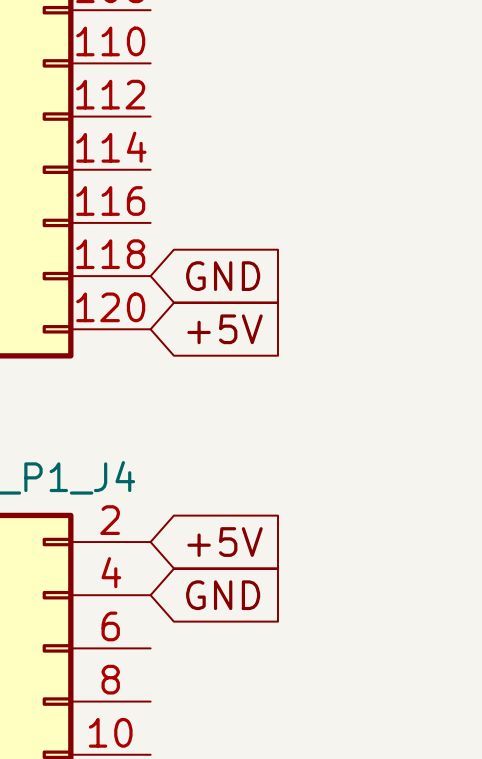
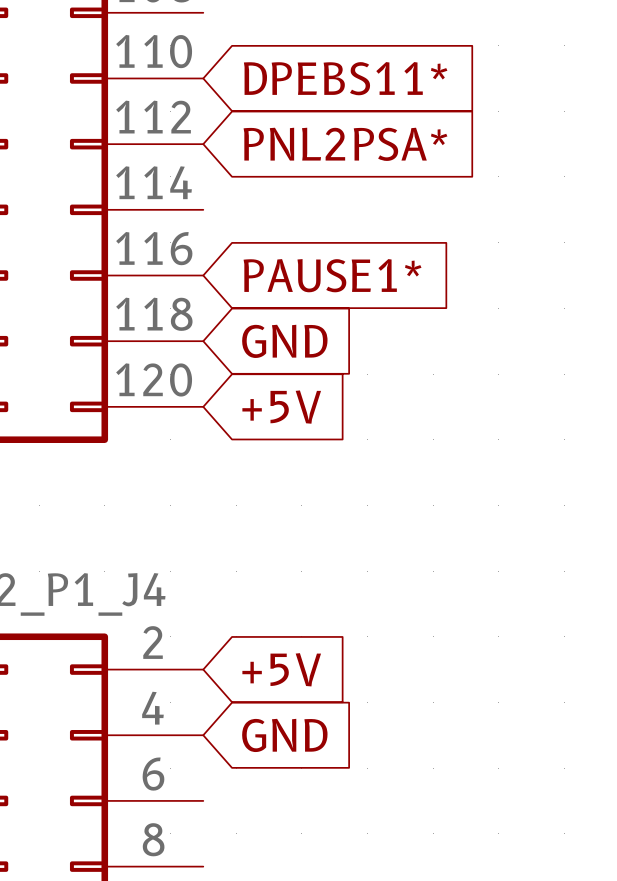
global label: none -> DPEBS11* (345, 78)
global label: none -> PNL2PSA* (345, 144)
global label: none -> PAUSE1* (332, 275)

